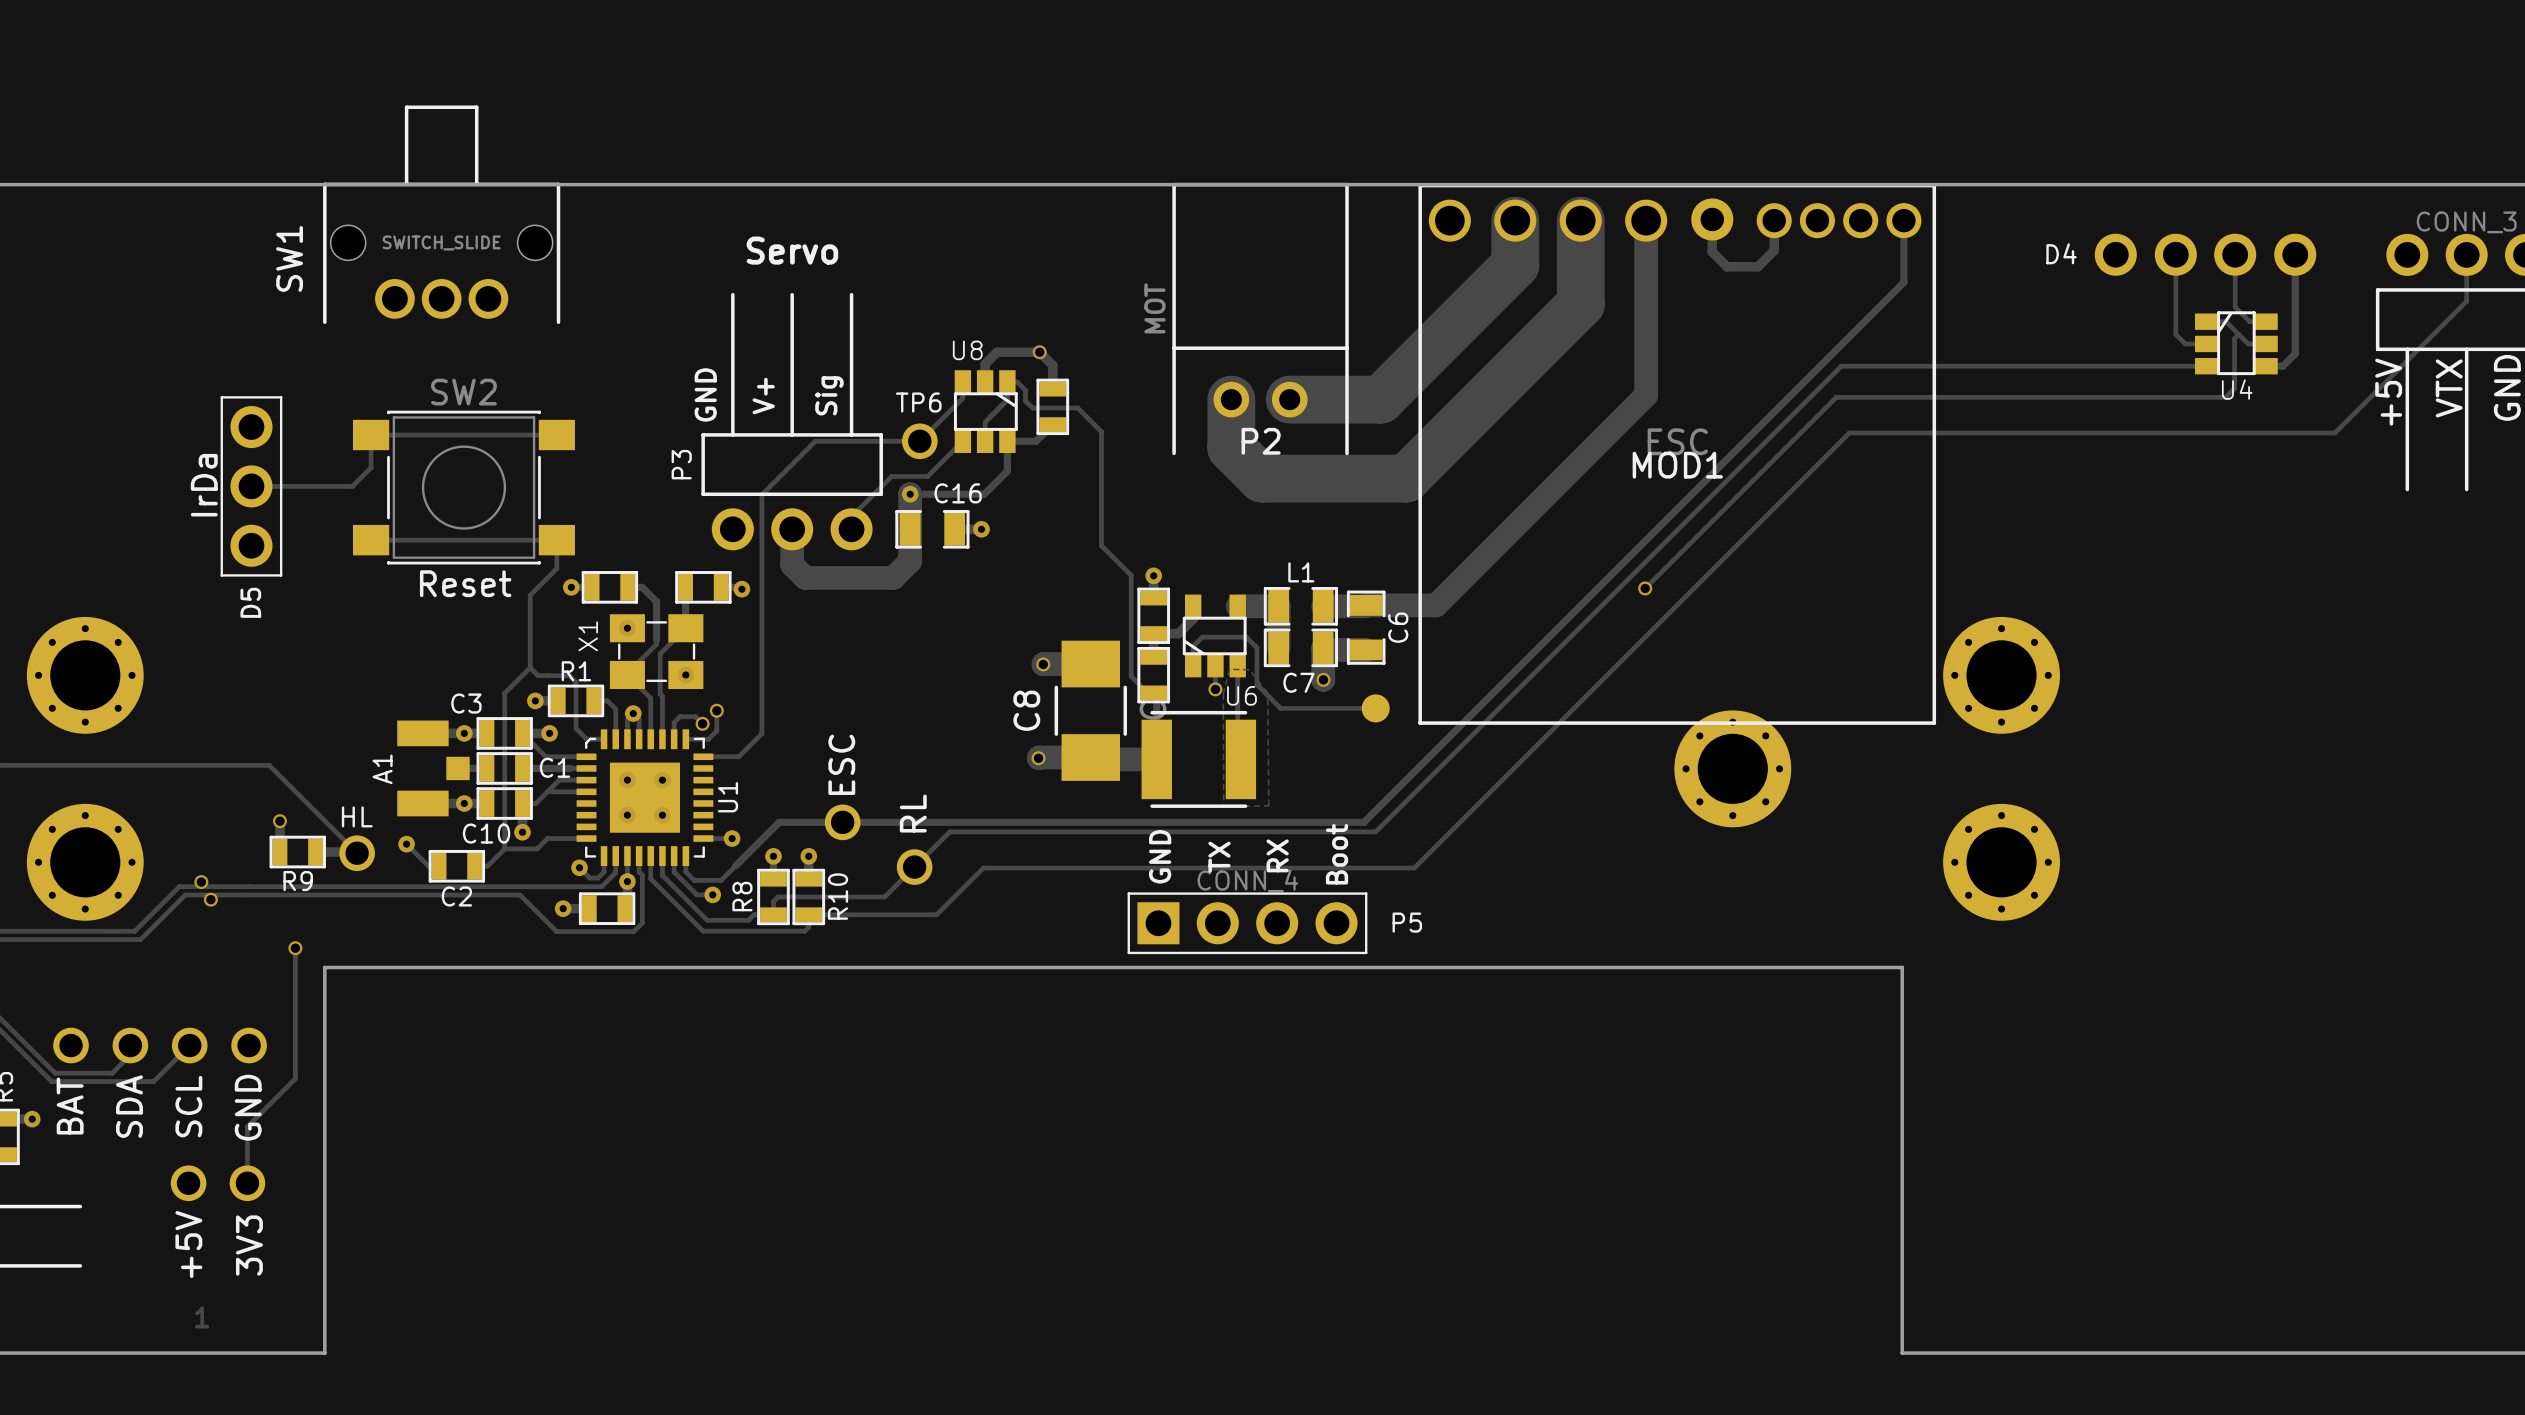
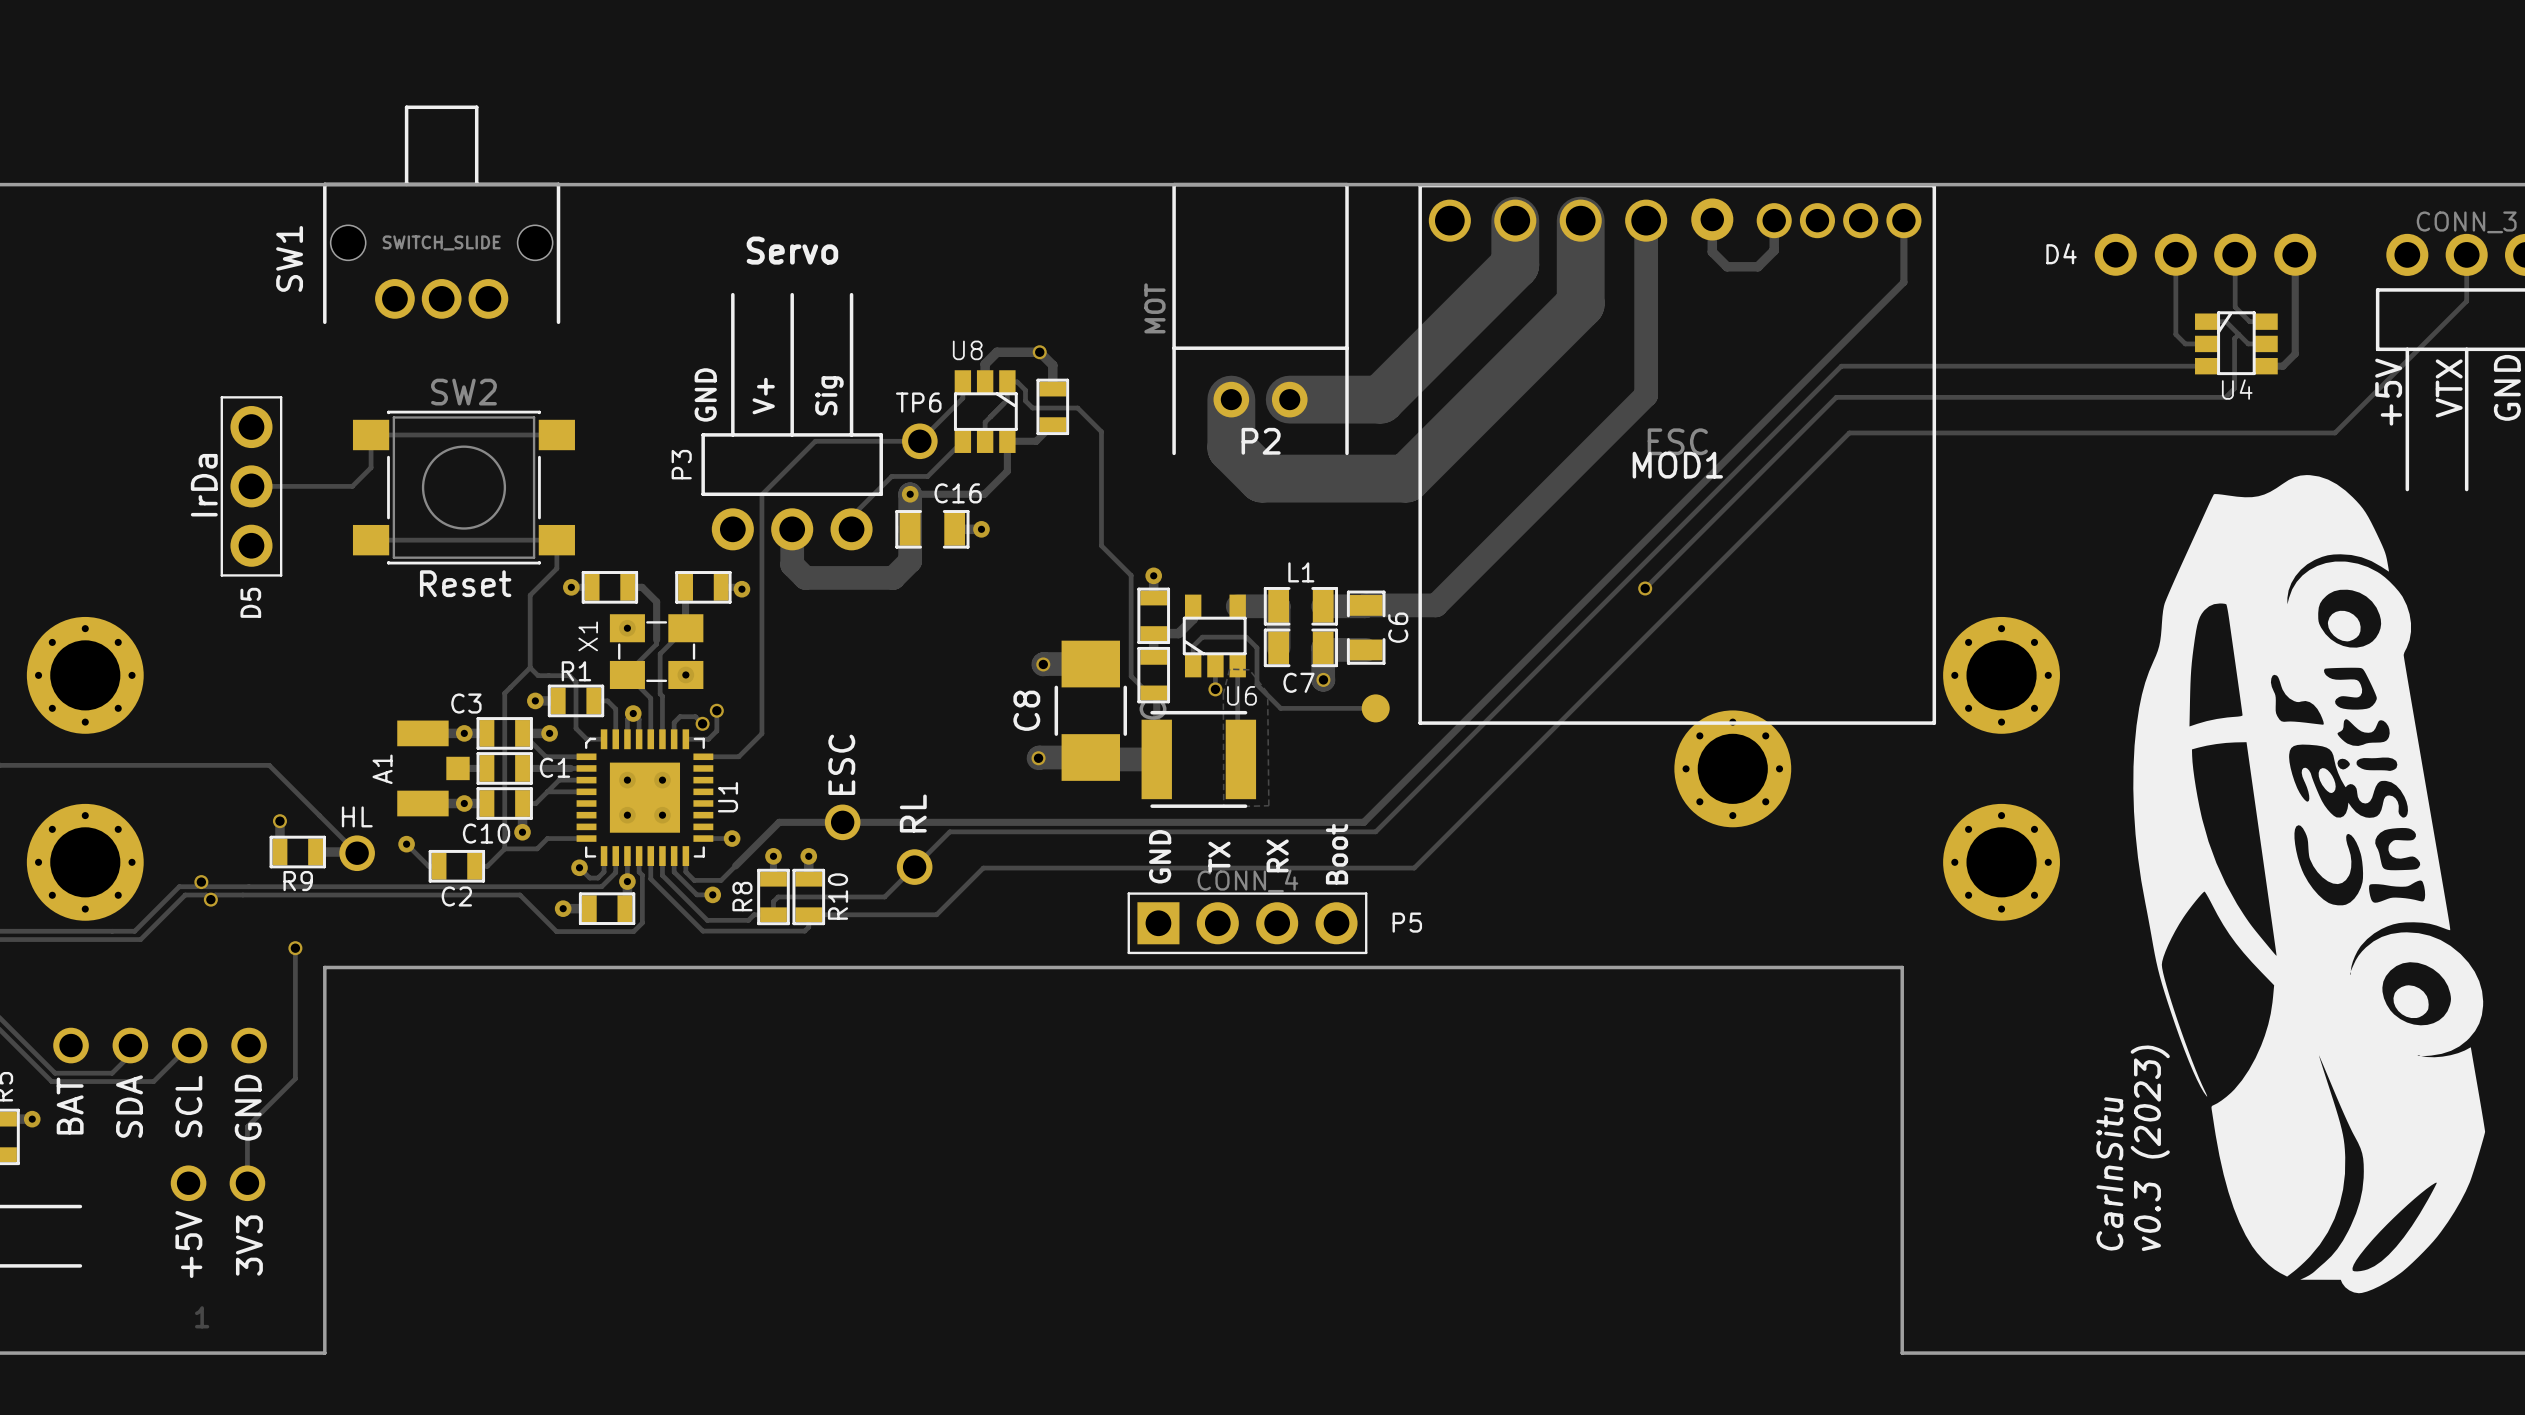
drawing: none -> [2133, 475, 2486, 1294]
text: none -> v0.3 (2023) (2150, 1148)
text: none -> CarInSitu (2109, 1173)

